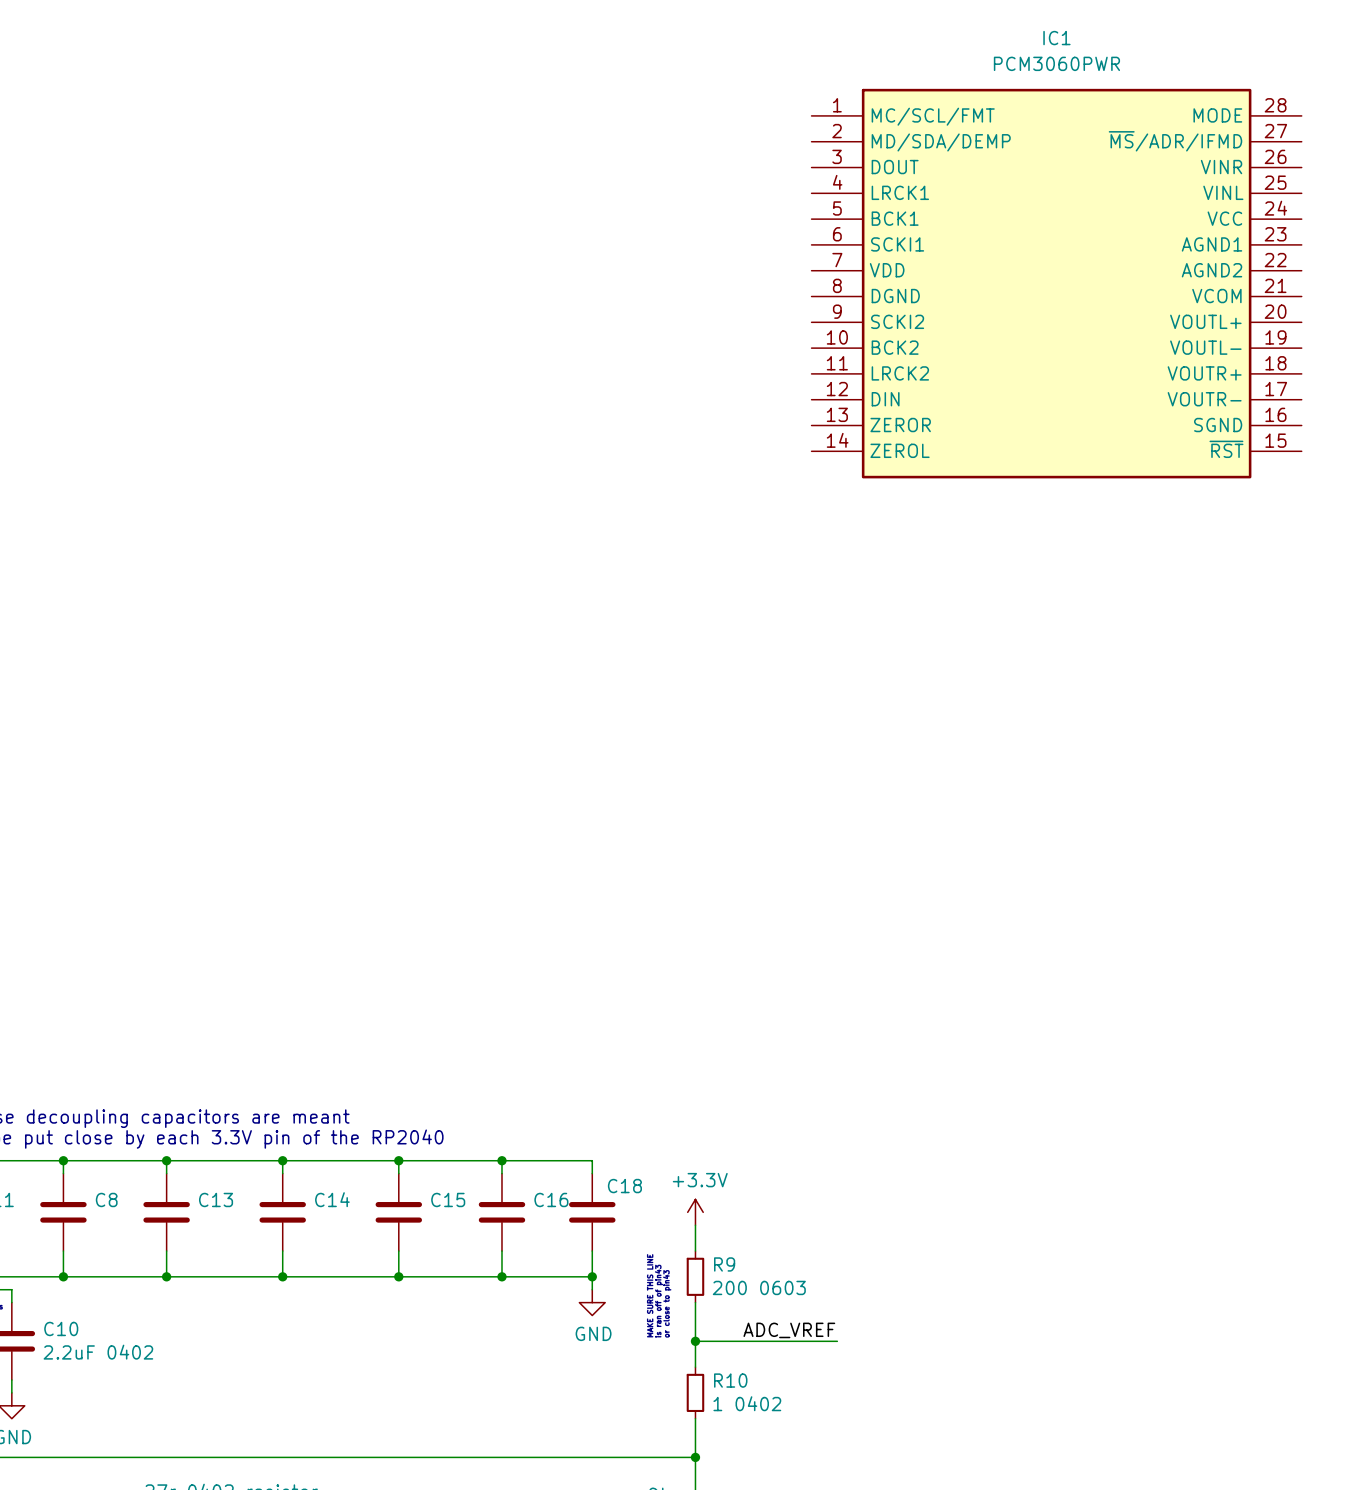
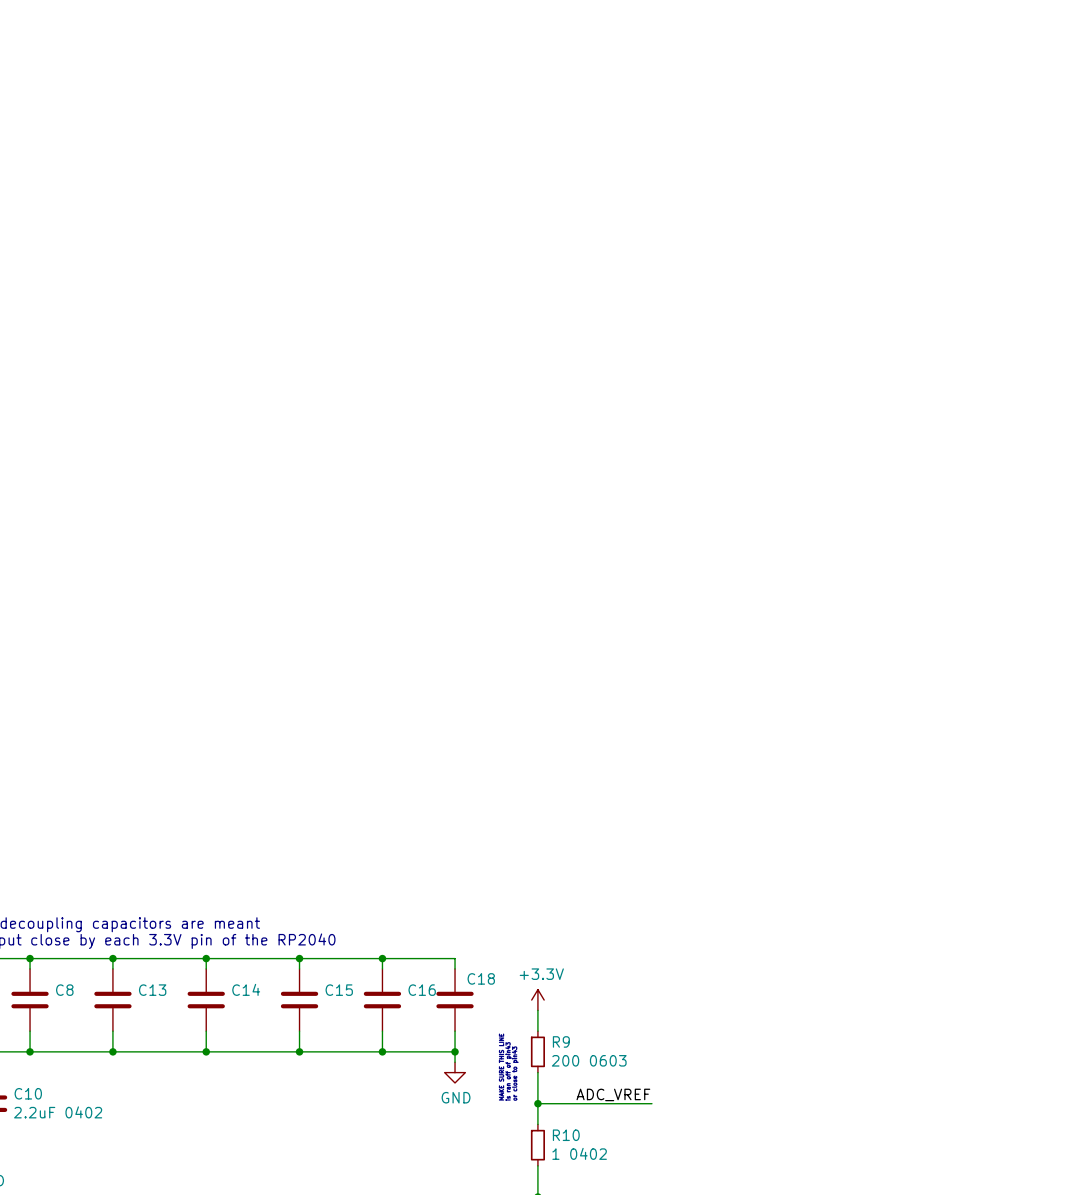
IC1: PCM3060PWR (1056, 283) -> none

